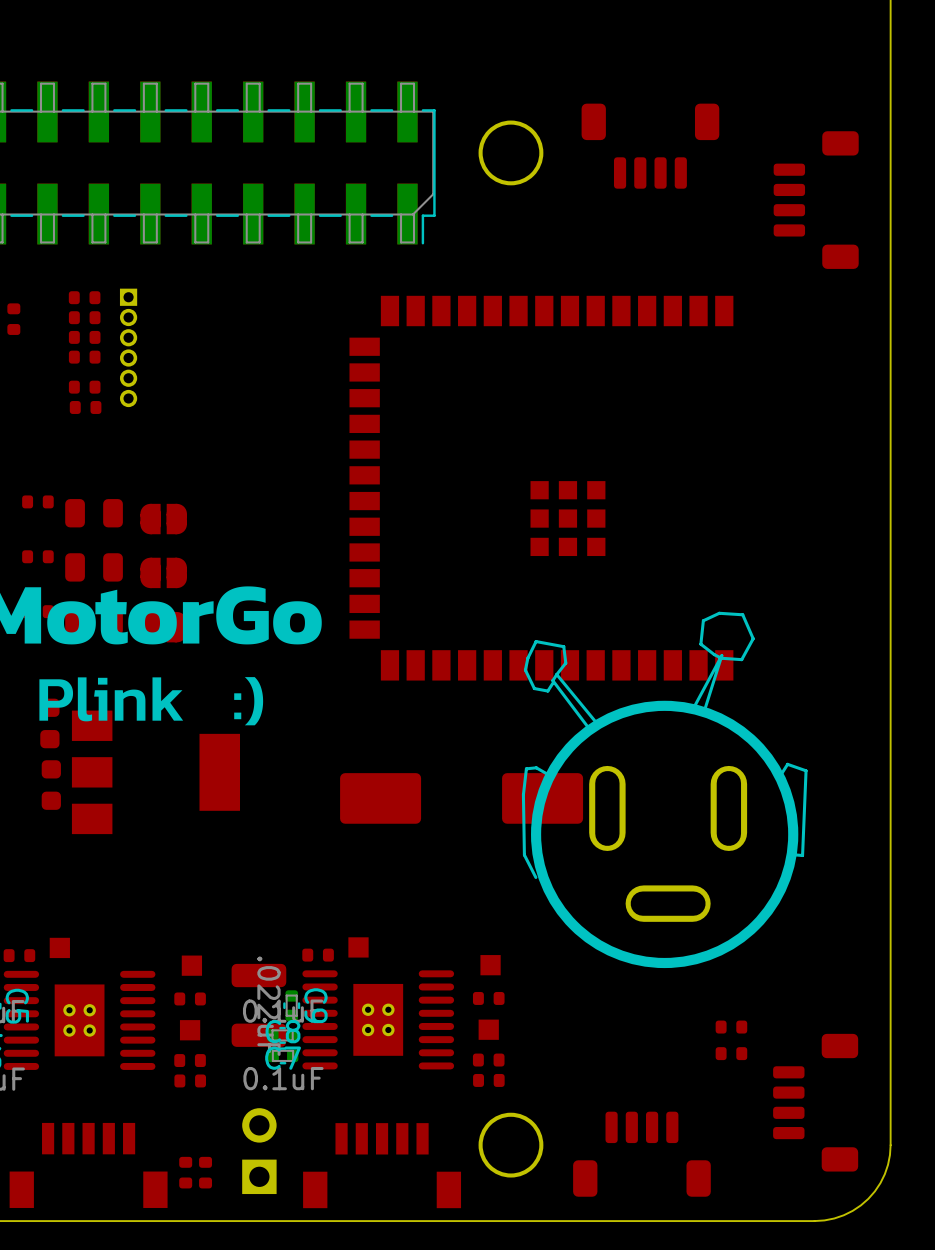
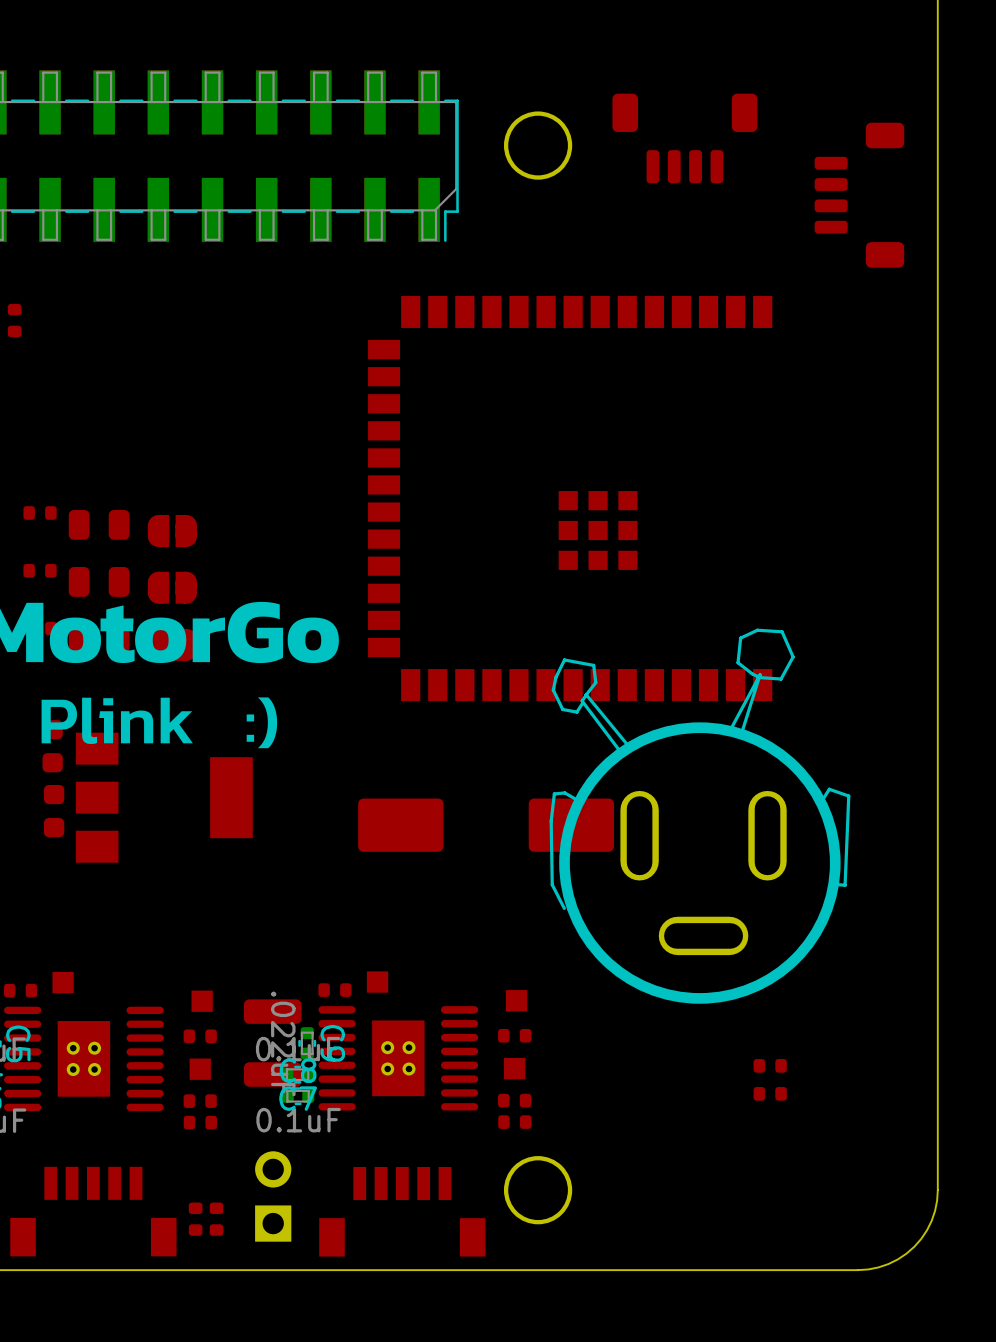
part: (84, 297) -> none
part: (84, 317) -> none
part: (84, 337) -> none
part: (128, 347) -> none
part: (84, 357) -> none
part: (84, 387) -> none
part: (85, 407) -> none
part: (815, 1102) -> none
part: (641, 1154) -> none

